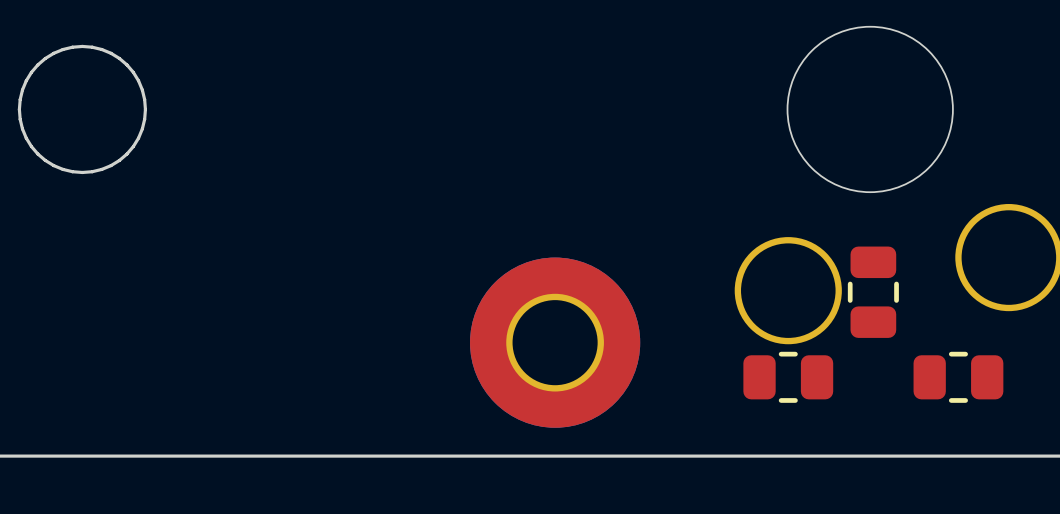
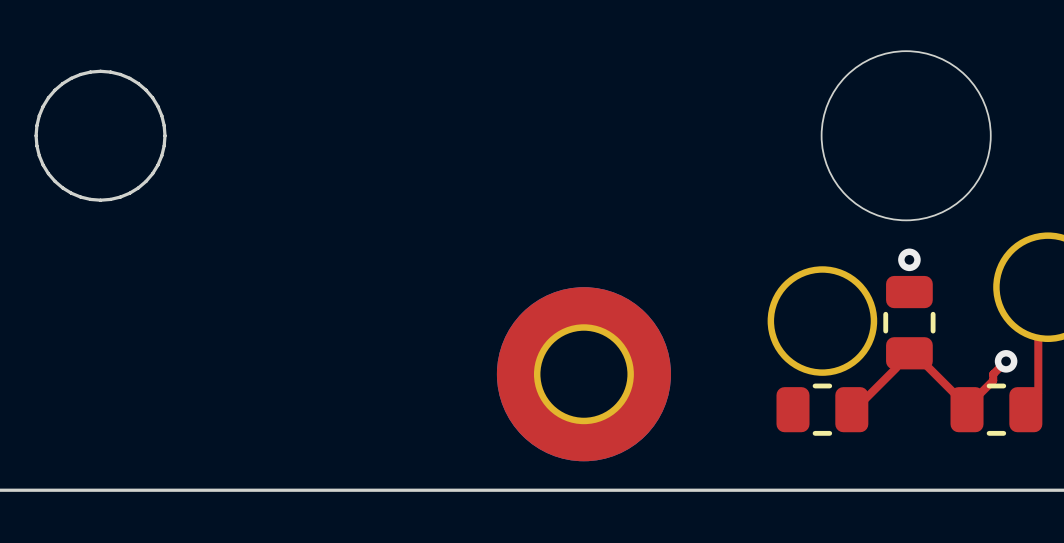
via: none -> (909, 259)
top track: none -> (1038, 335) (1038, 393)
top track: none -> (922, 361) (954, 393)
top track: none -> (1006, 361) (993, 374) (993, 380) (980, 393)
via: none -> (1006, 361)
top track: none -> (896, 367) (864, 400)

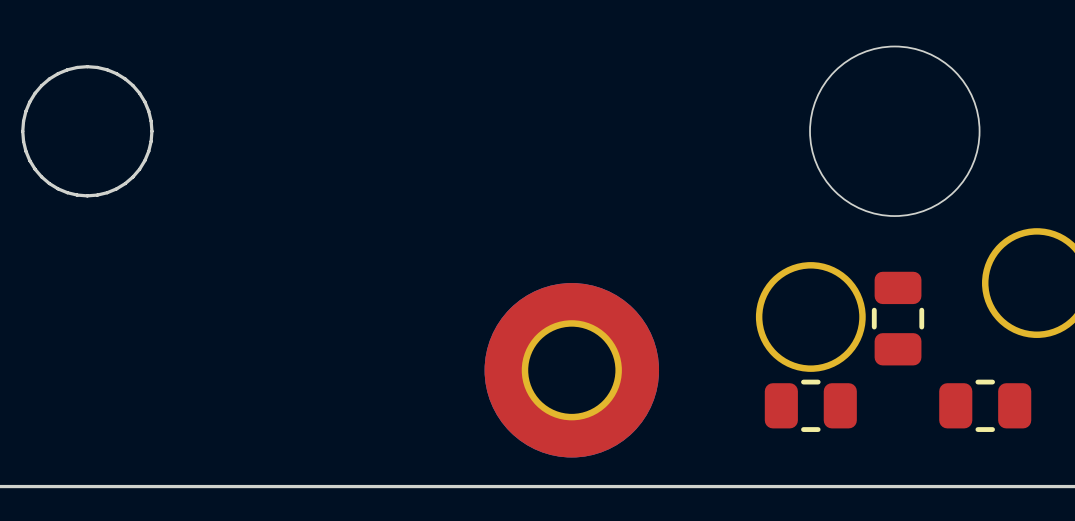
via: (909, 259) -> none
top track: (1038, 335) (1038, 393) -> none
top track: (922, 361) (954, 393) -> none
top track: (1006, 361) (993, 374) (993, 380) (980, 393) -> none
via: (1006, 361) -> none
top track: (896, 367) (864, 400) -> none

